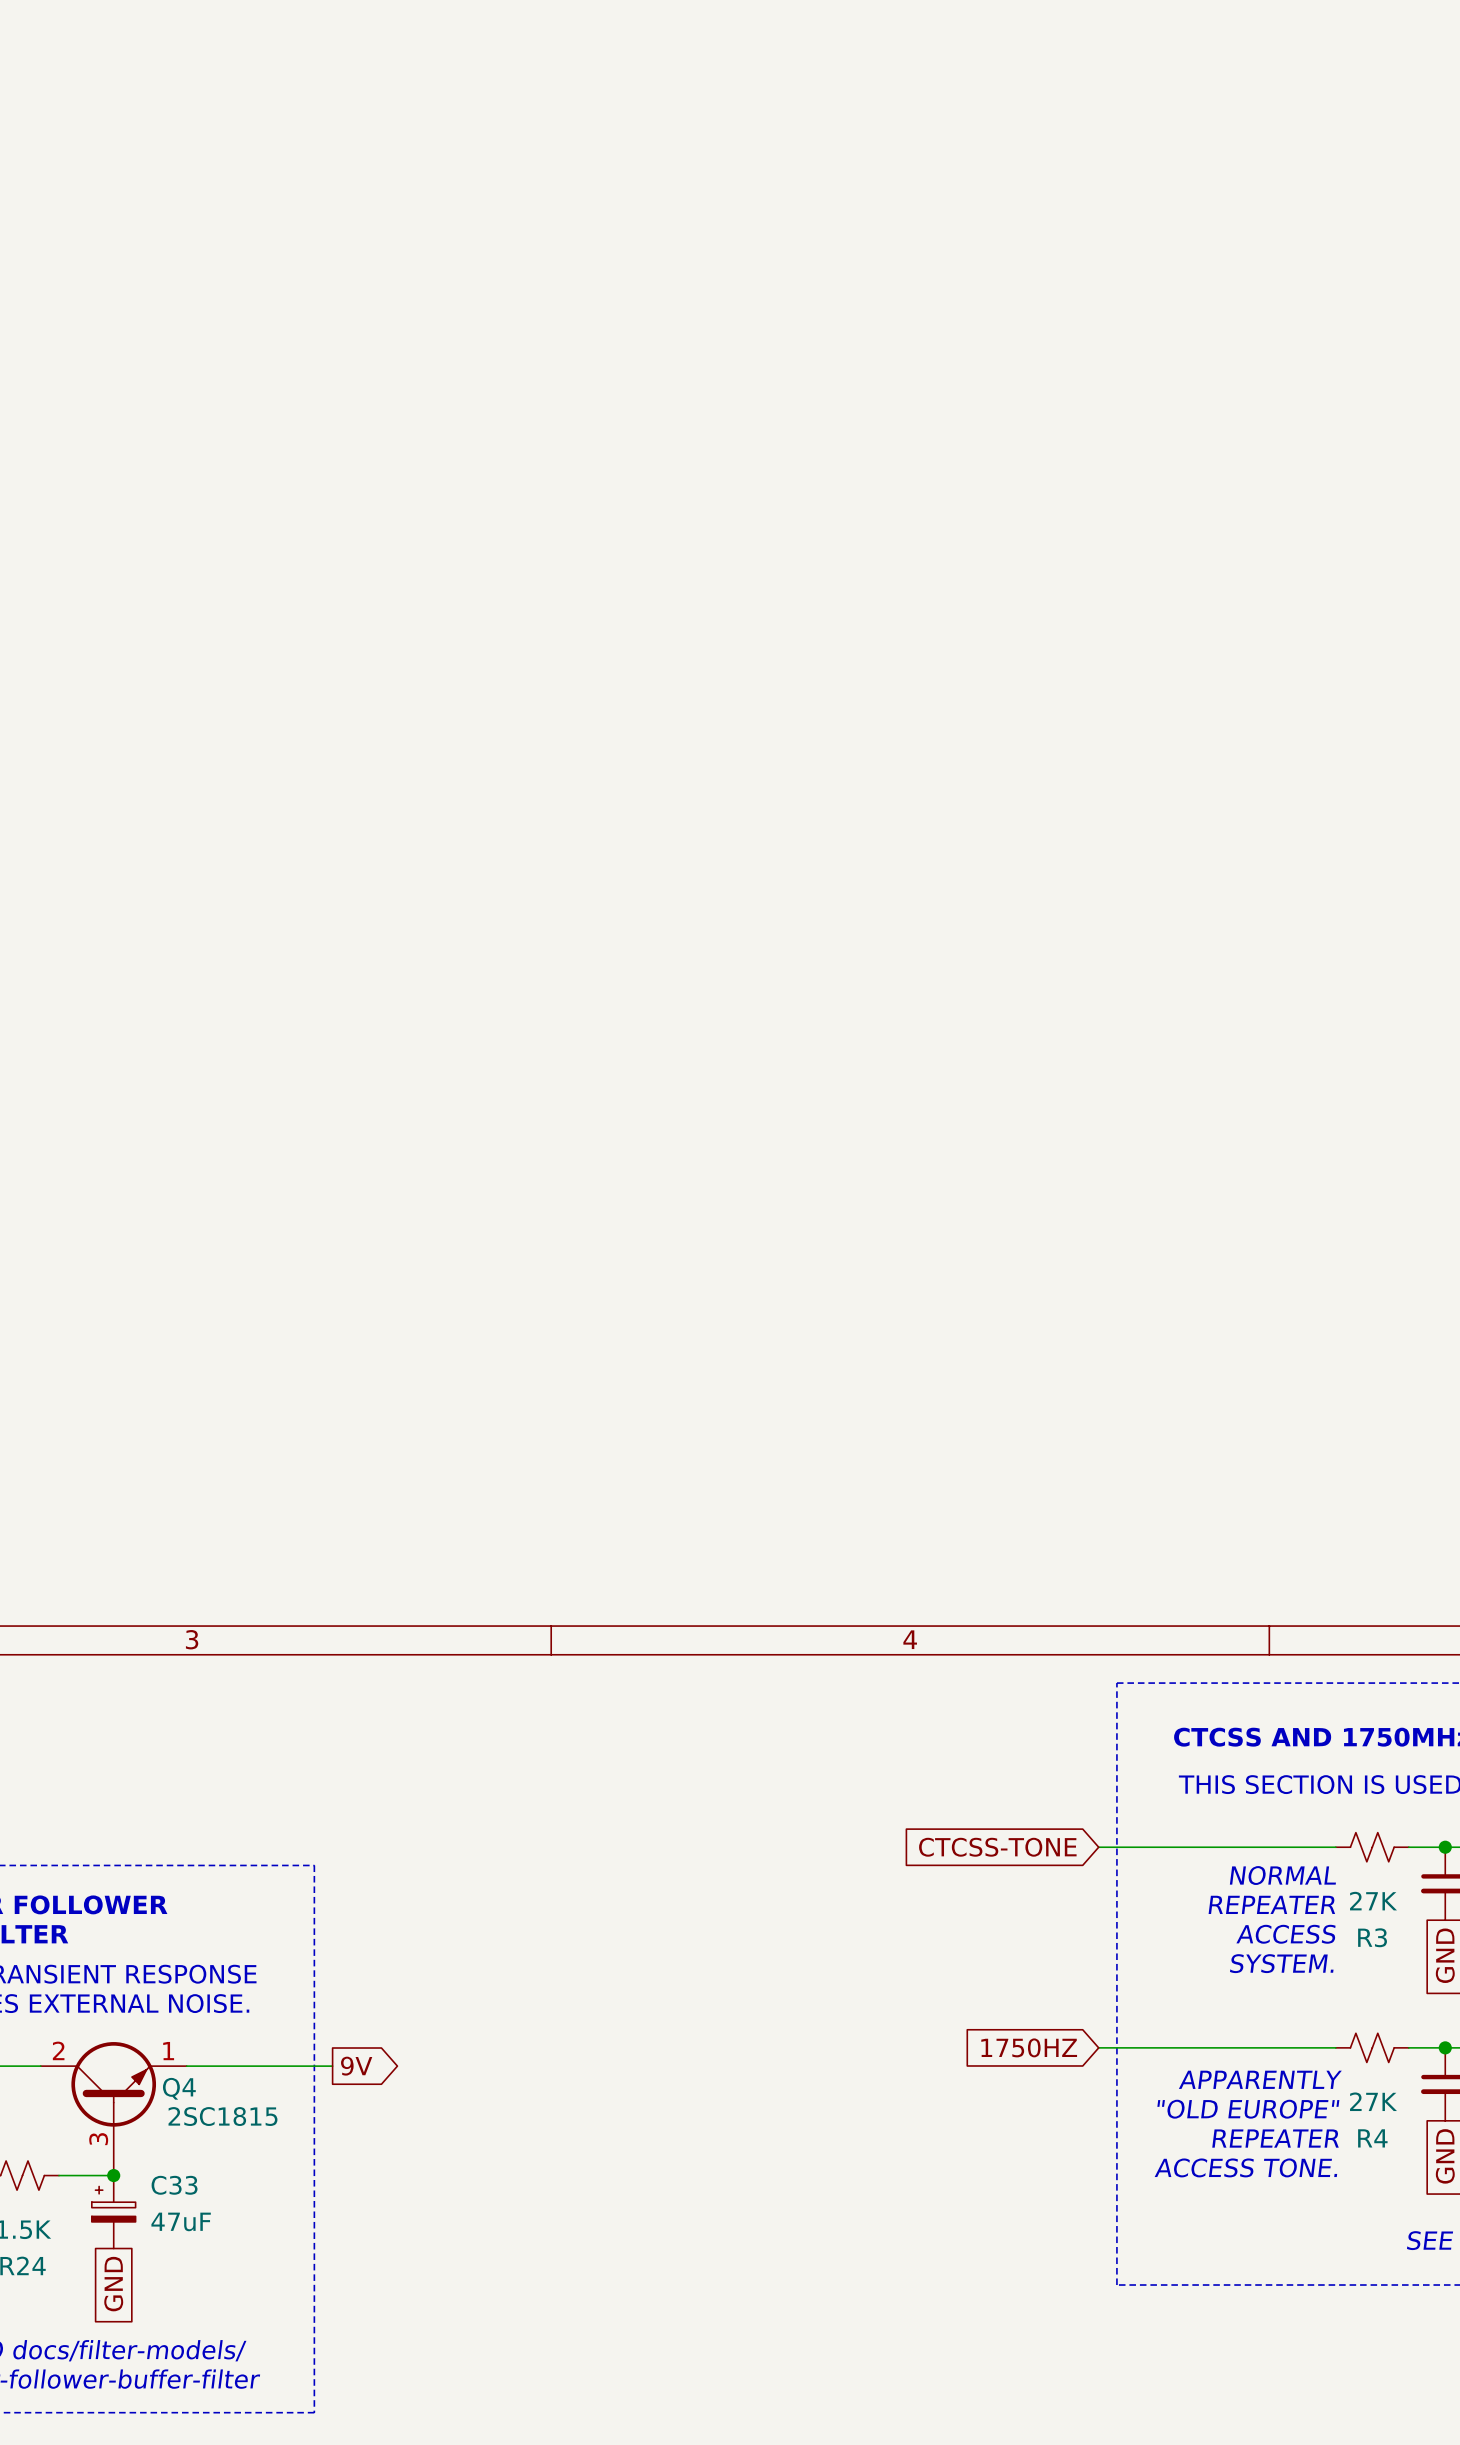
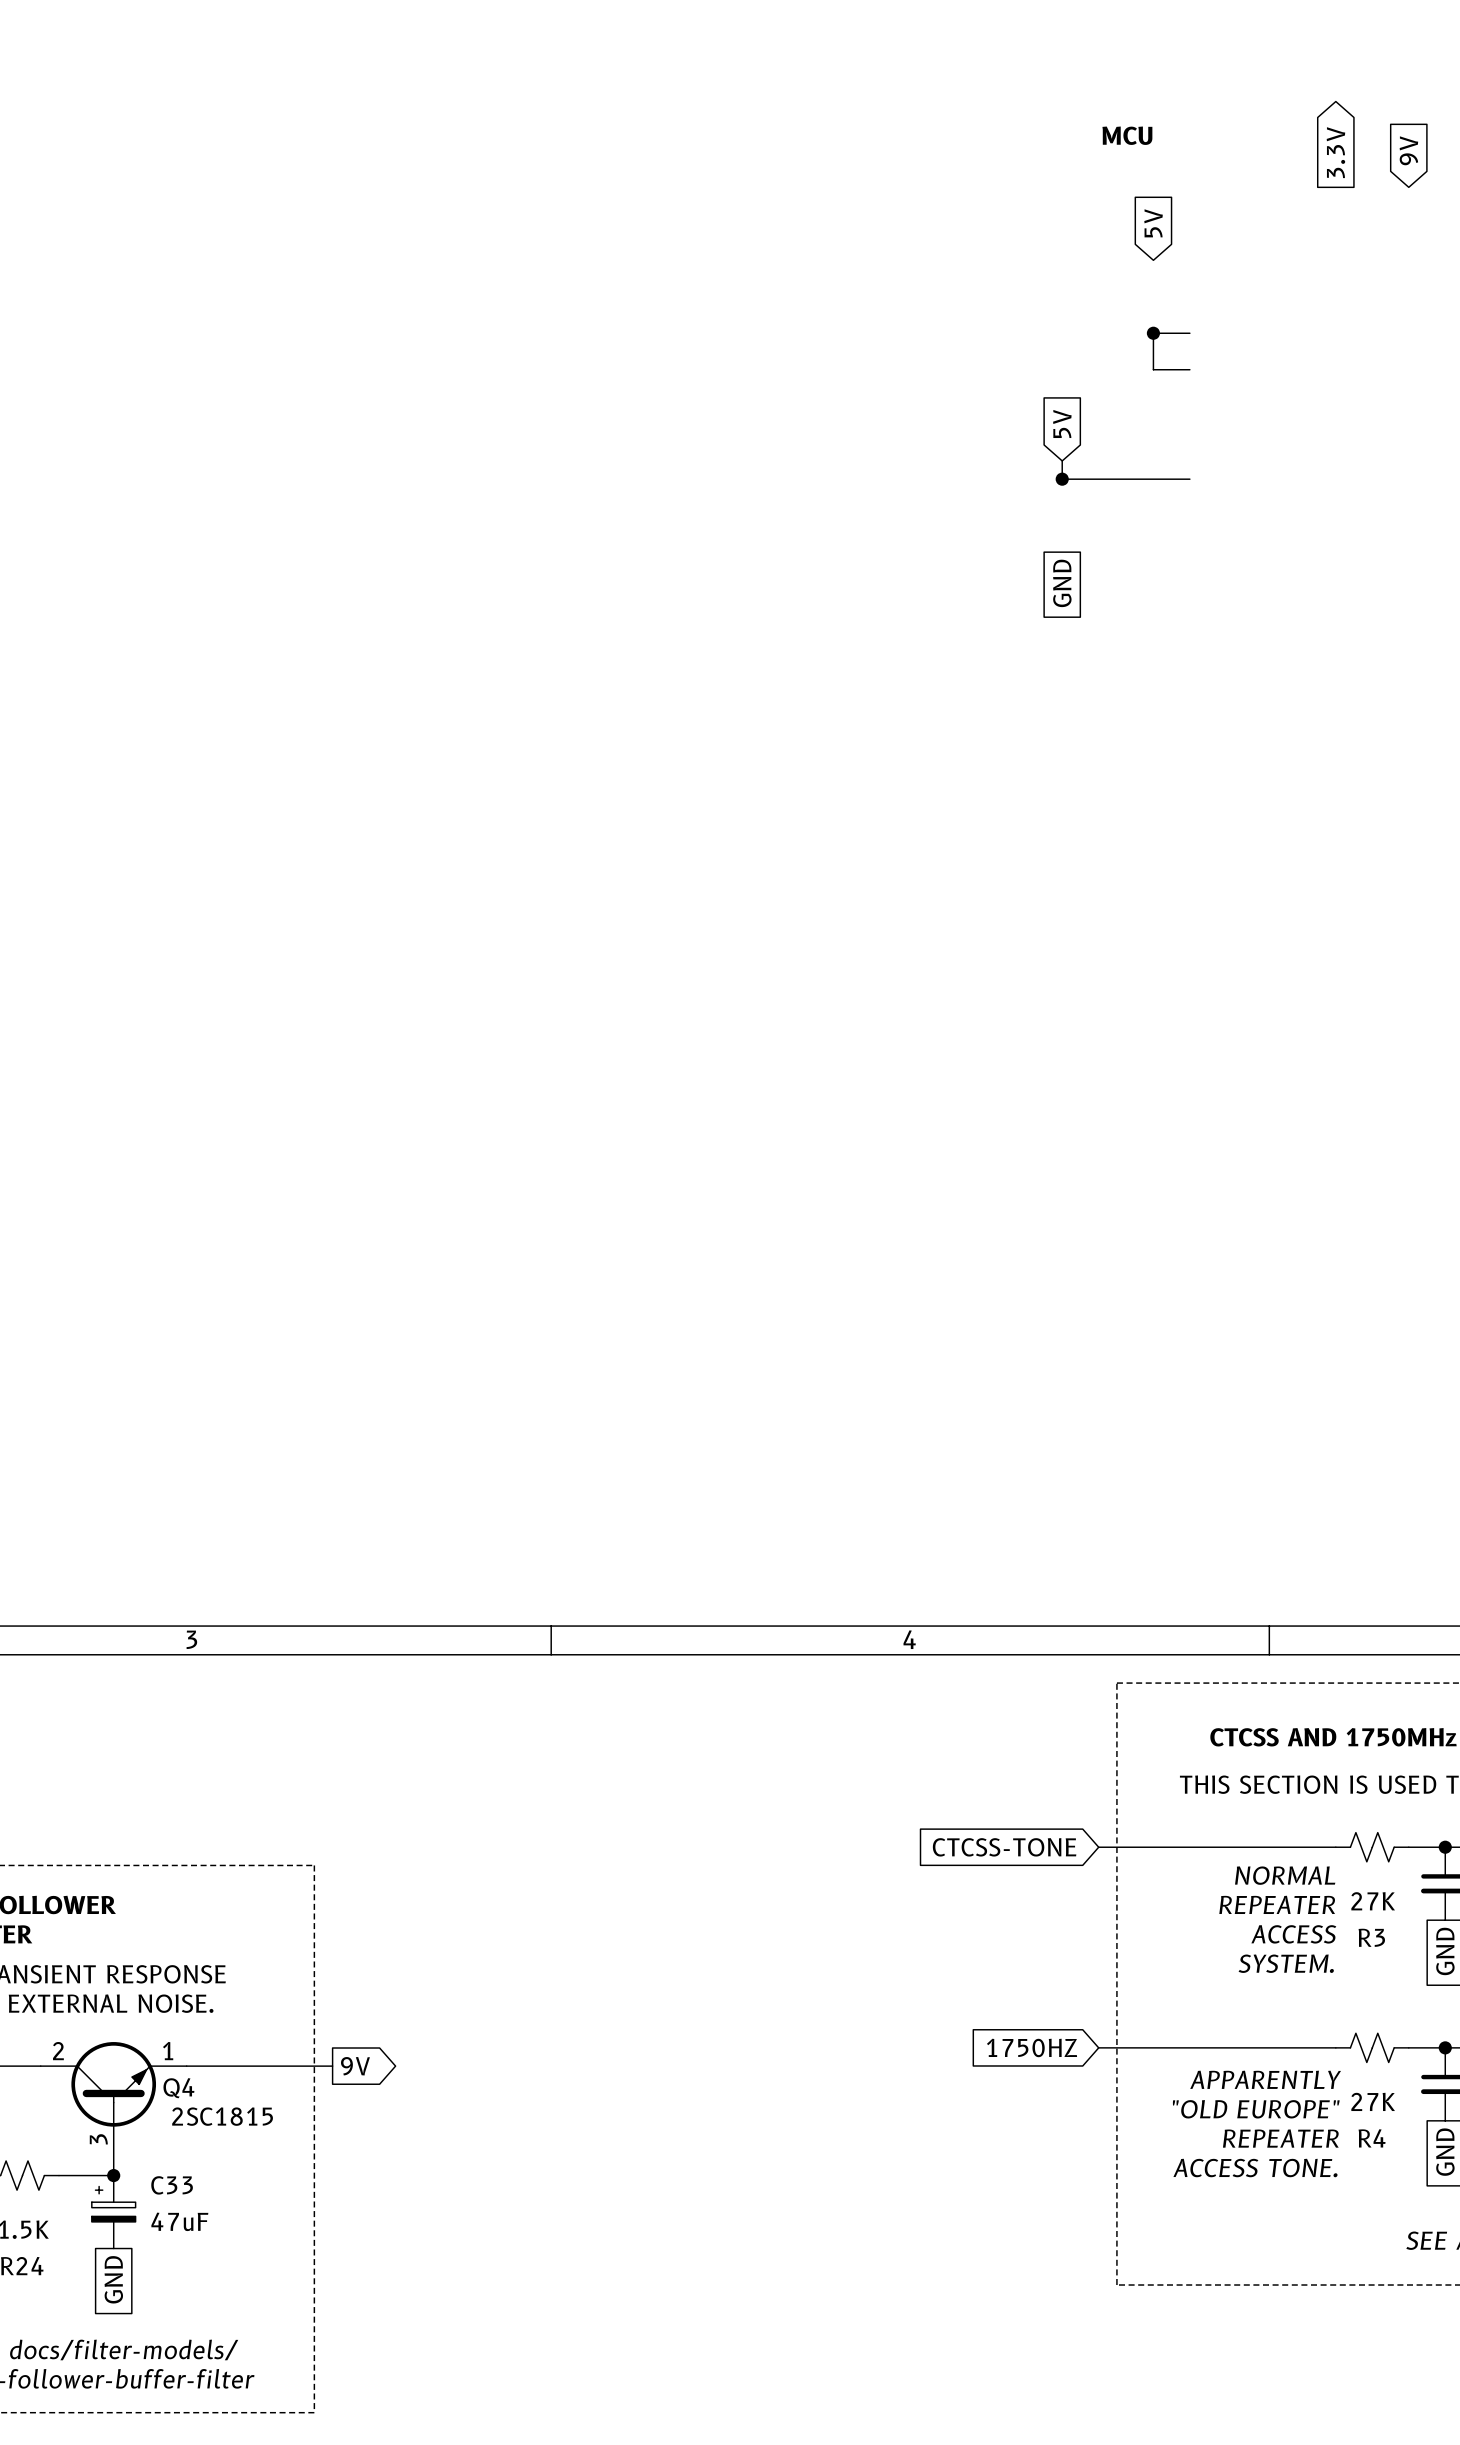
text: none -> MCU (1127, 135)
global label: none -> 9V (1408, 150)
global label: none -> 3.3V (1335, 152)
global label: none -> 5V (1153, 223)
junction: none -> (1153, 333)
wire: none -> (1189, 333) (1153, 333) (1153, 369) (1189, 369)
global label: none -> 5V (1062, 423)
wire: none -> (1062, 460) (1062, 479) (1189, 479)
junction: none -> (1062, 479)
global label: none -> GND (1062, 583)

